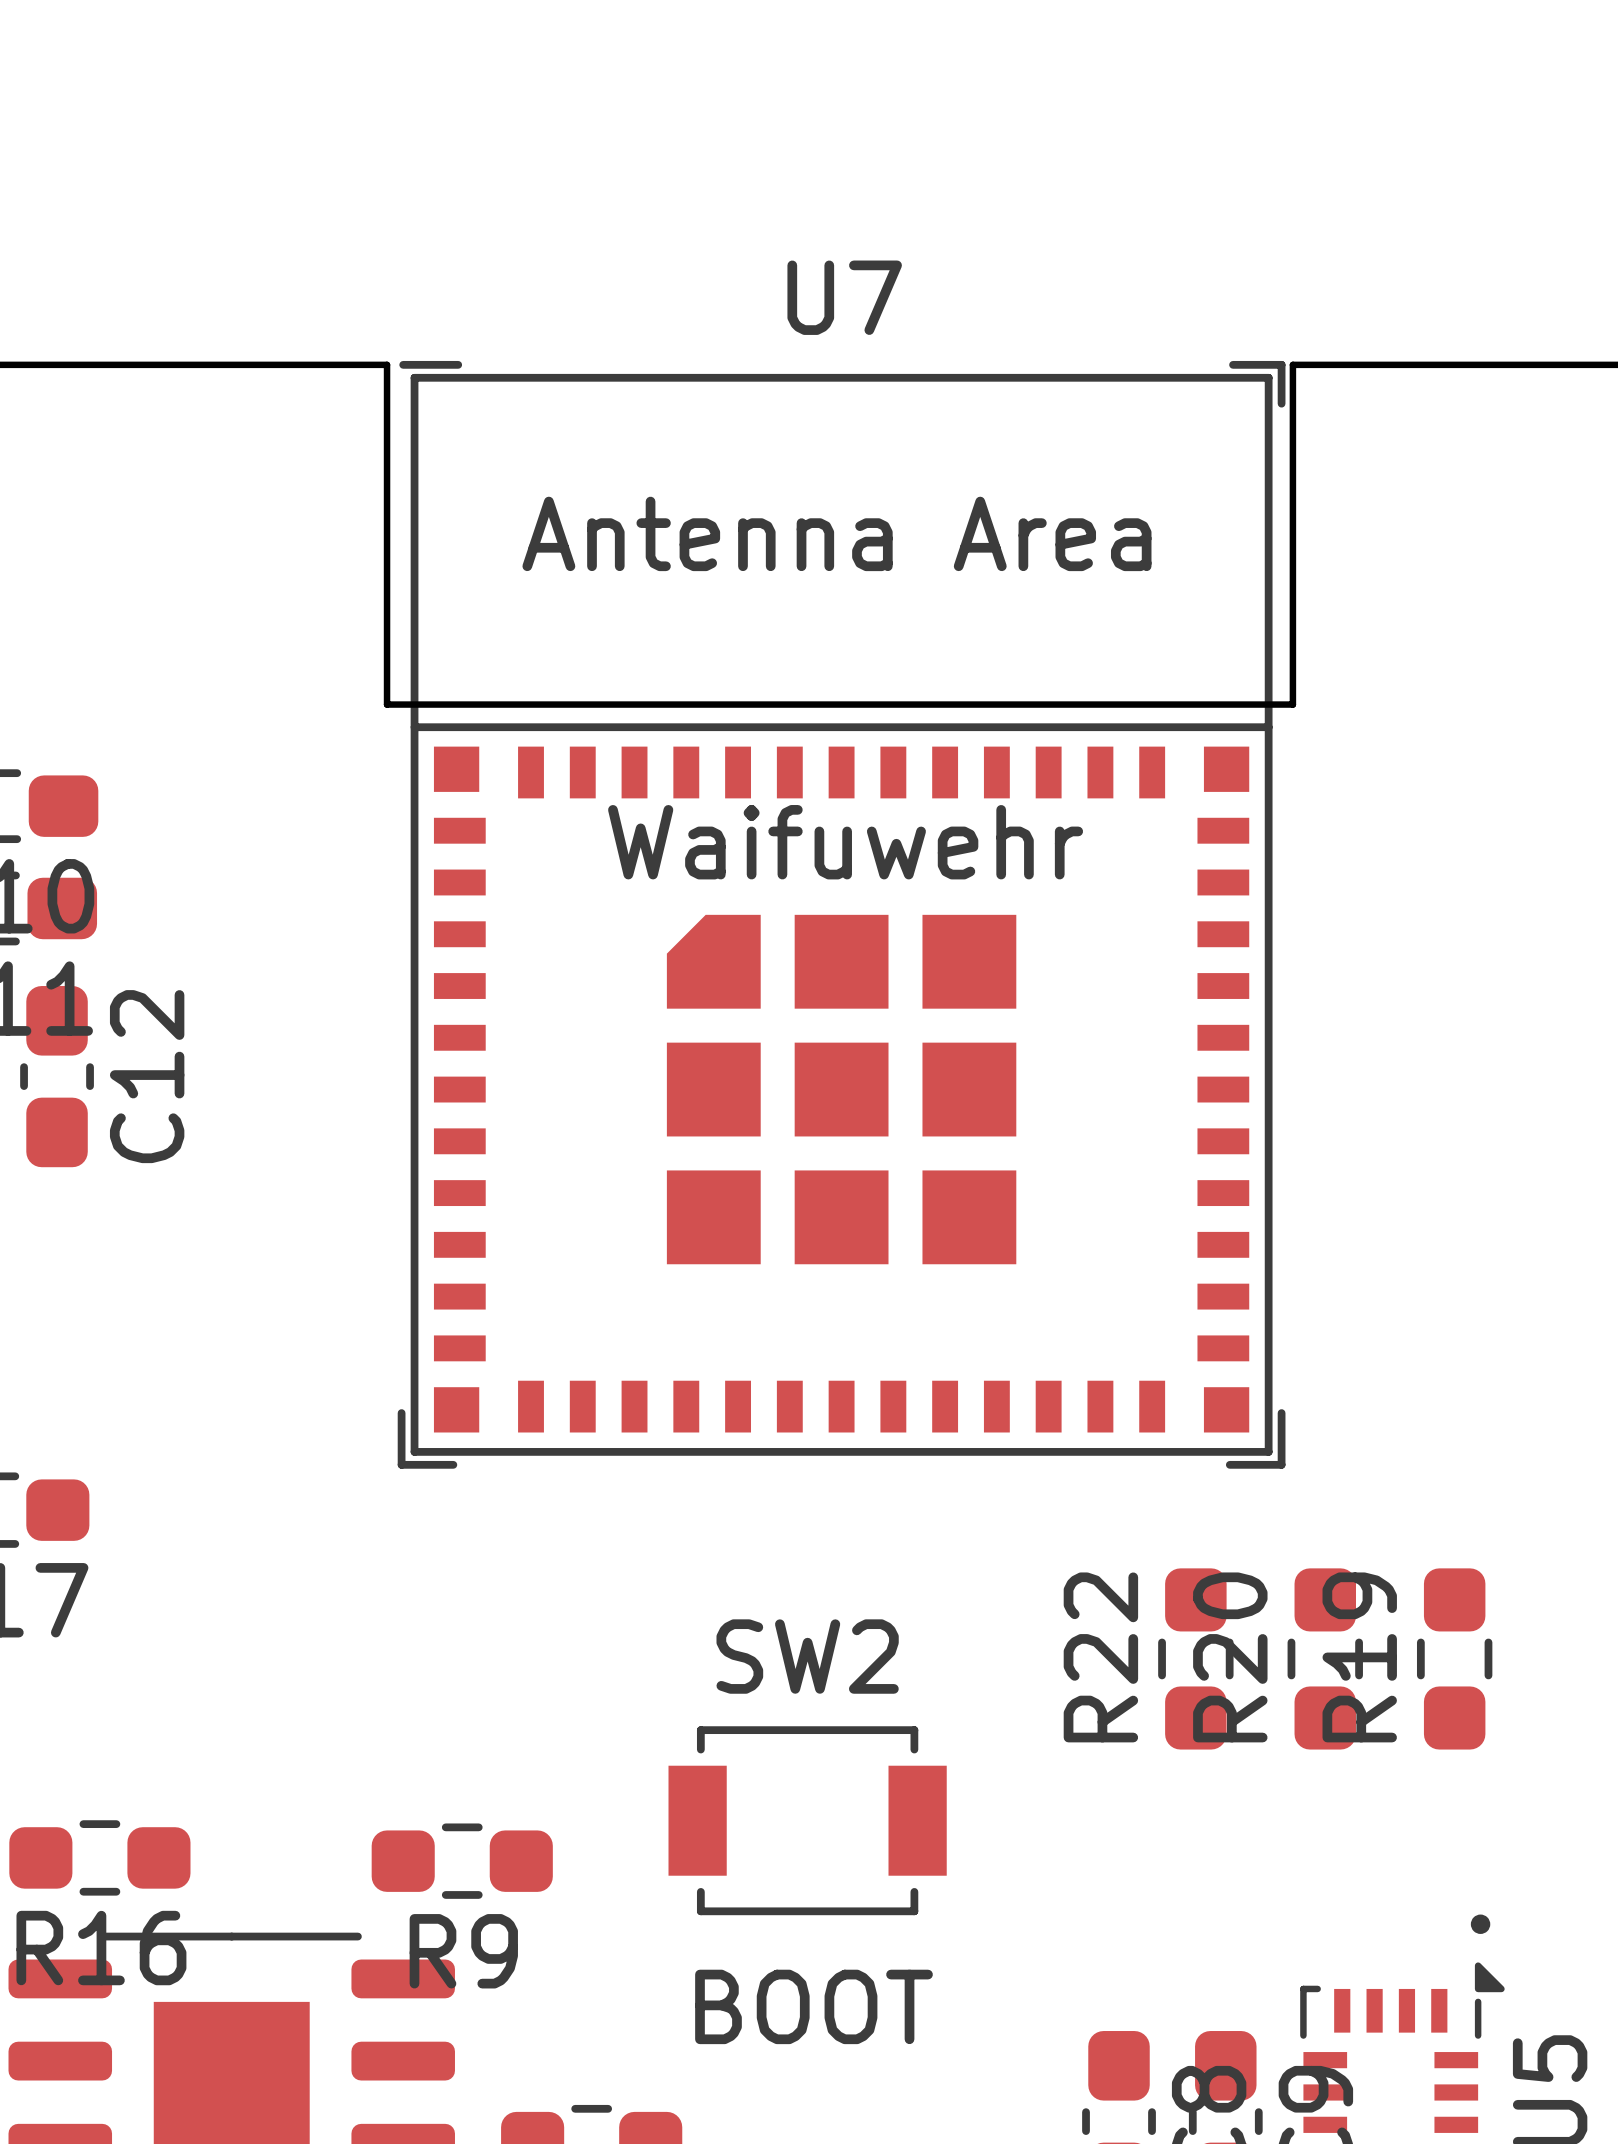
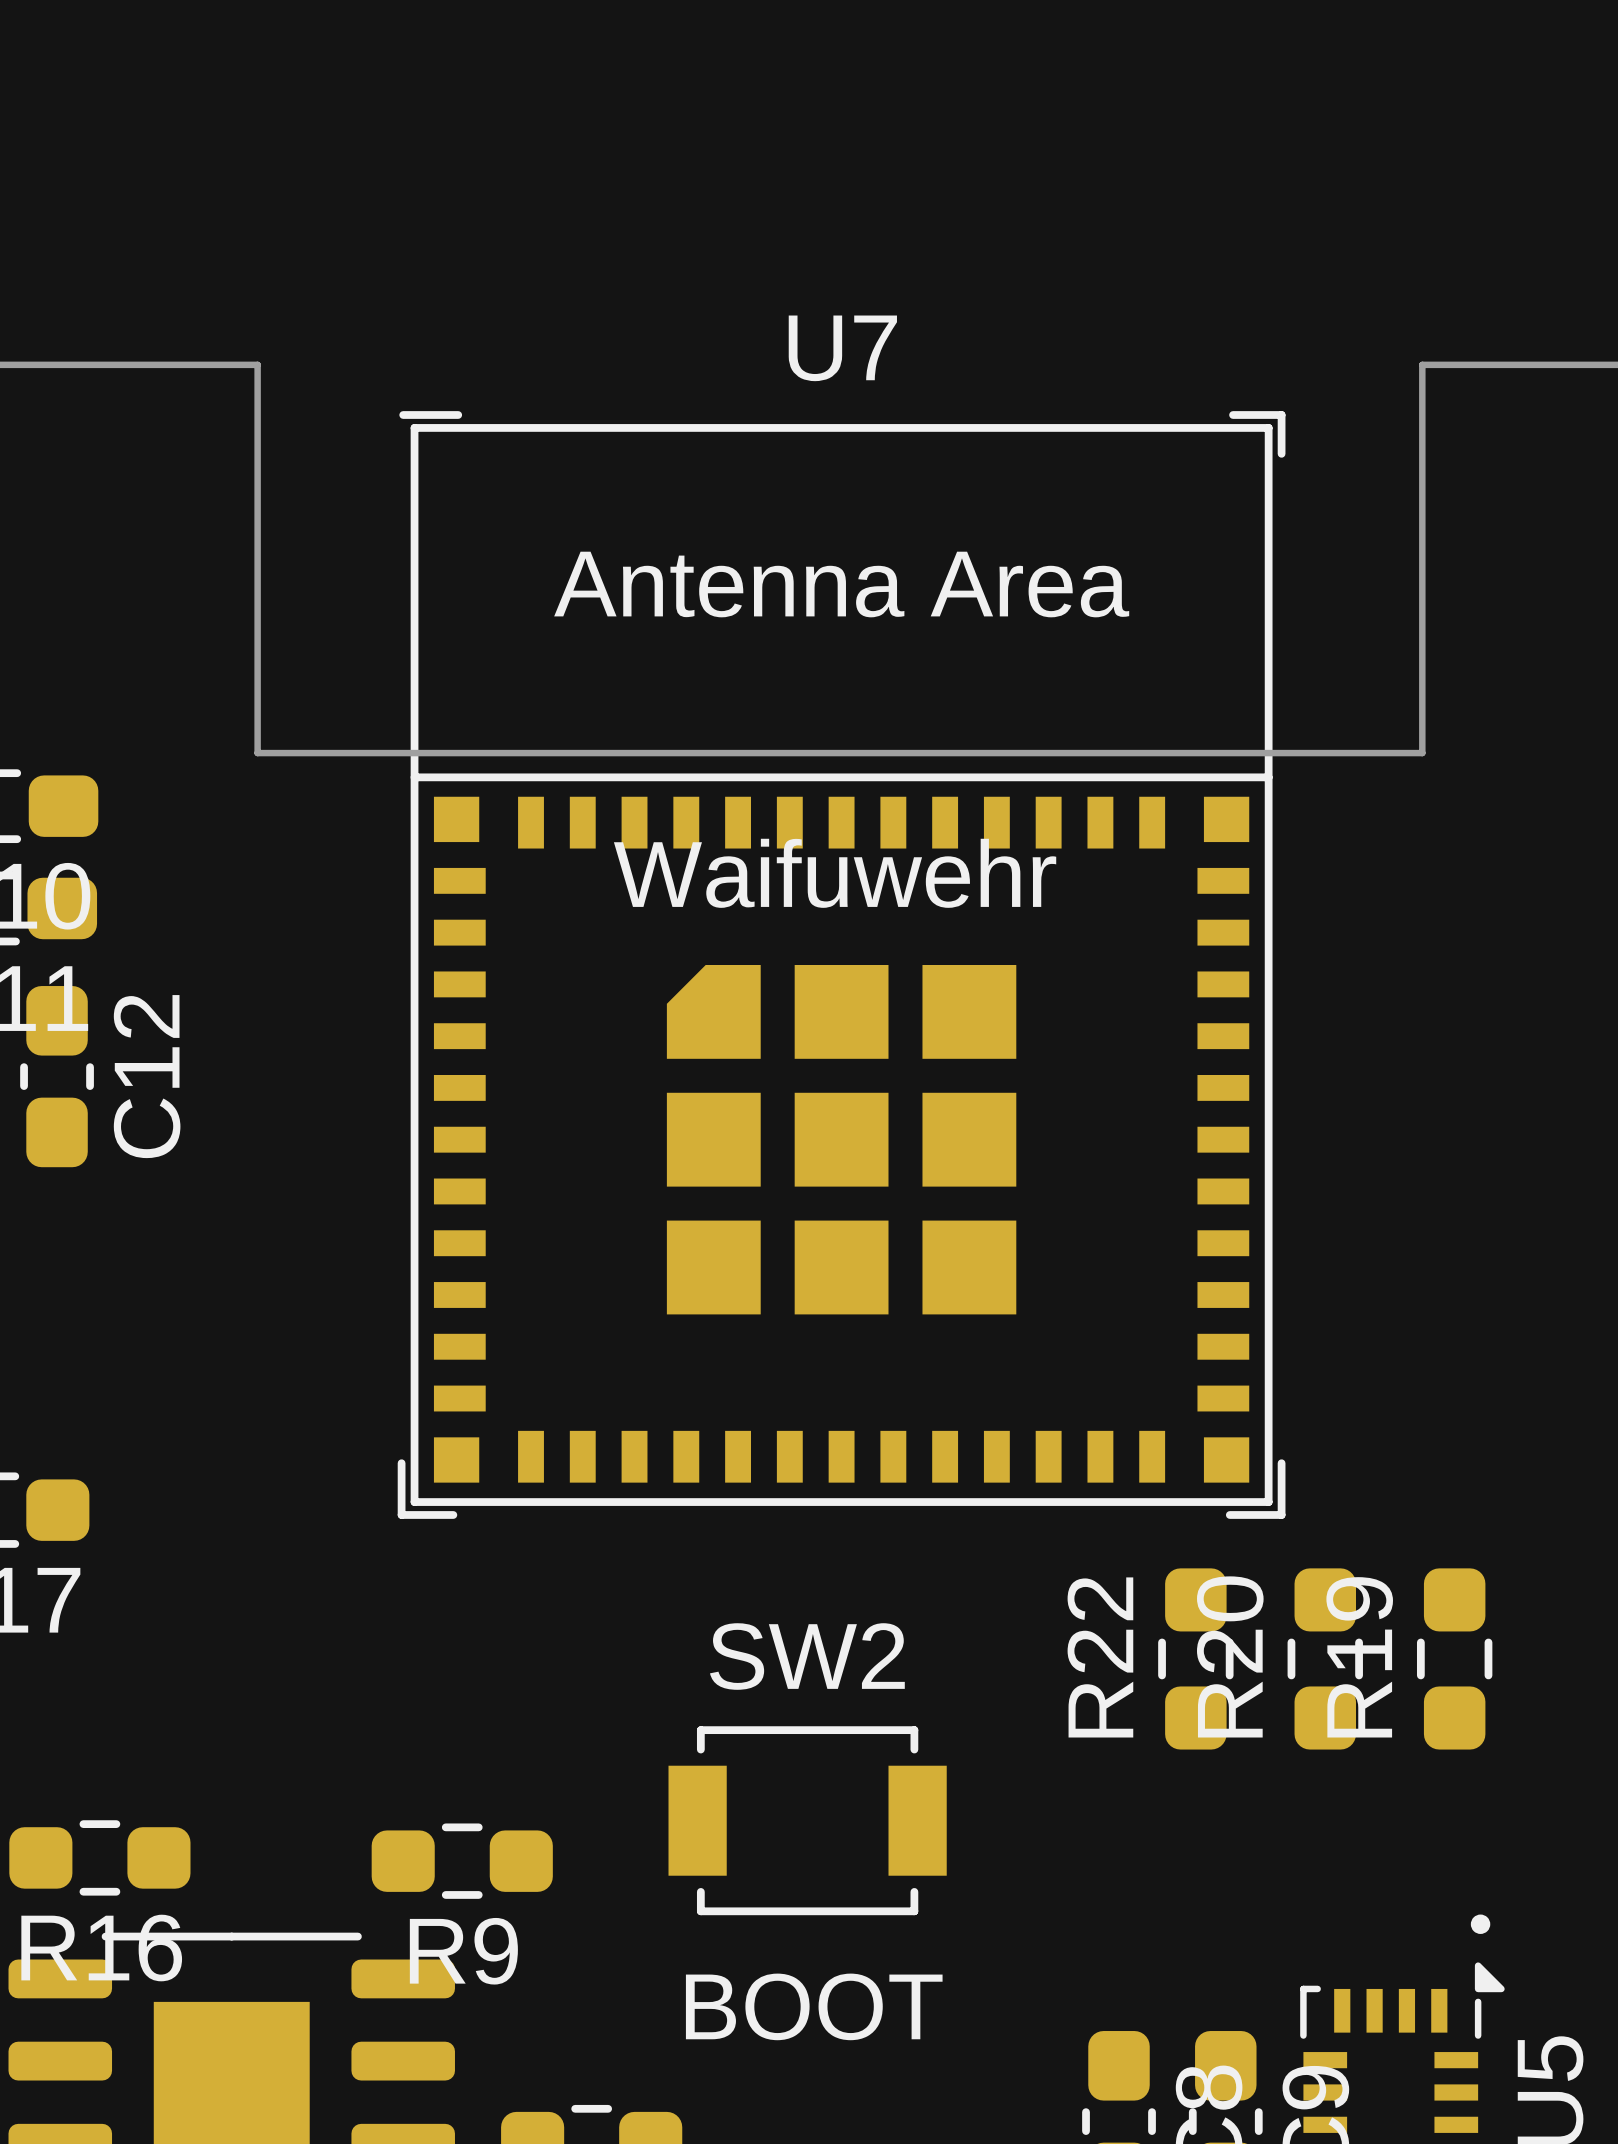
board edge: (257, 364) (387, 364) (387, 704) (1292, 704) (1292, 364) (1422, 364) -> (257, 364) (257, 753) (1422, 753) (1422, 364)
text position: Waifuwehr (845, 842) -> Waifuwehr (835, 873)
U7 position: (841, 914) -> (841, 964)

